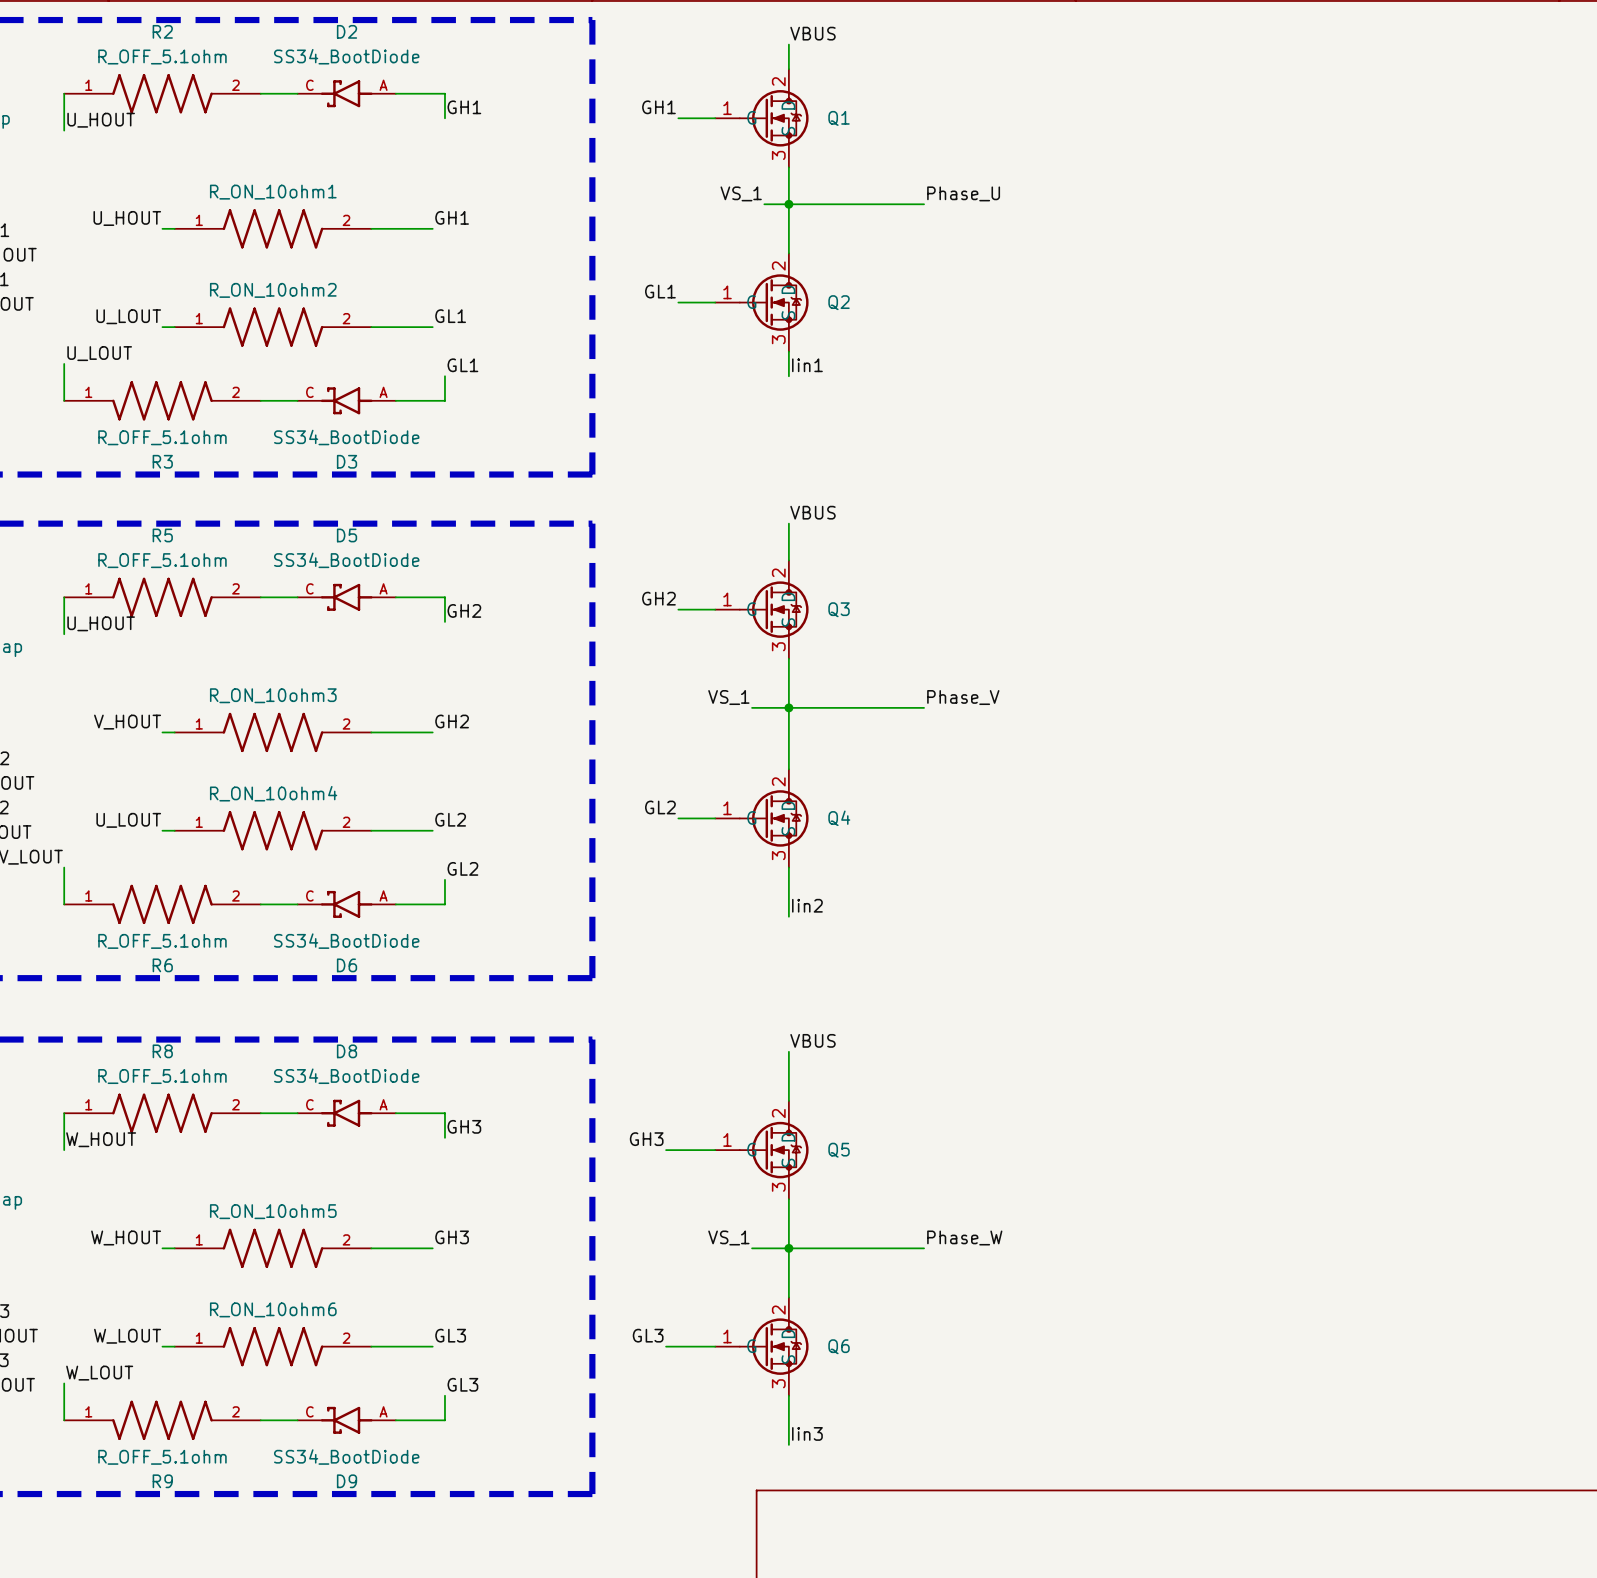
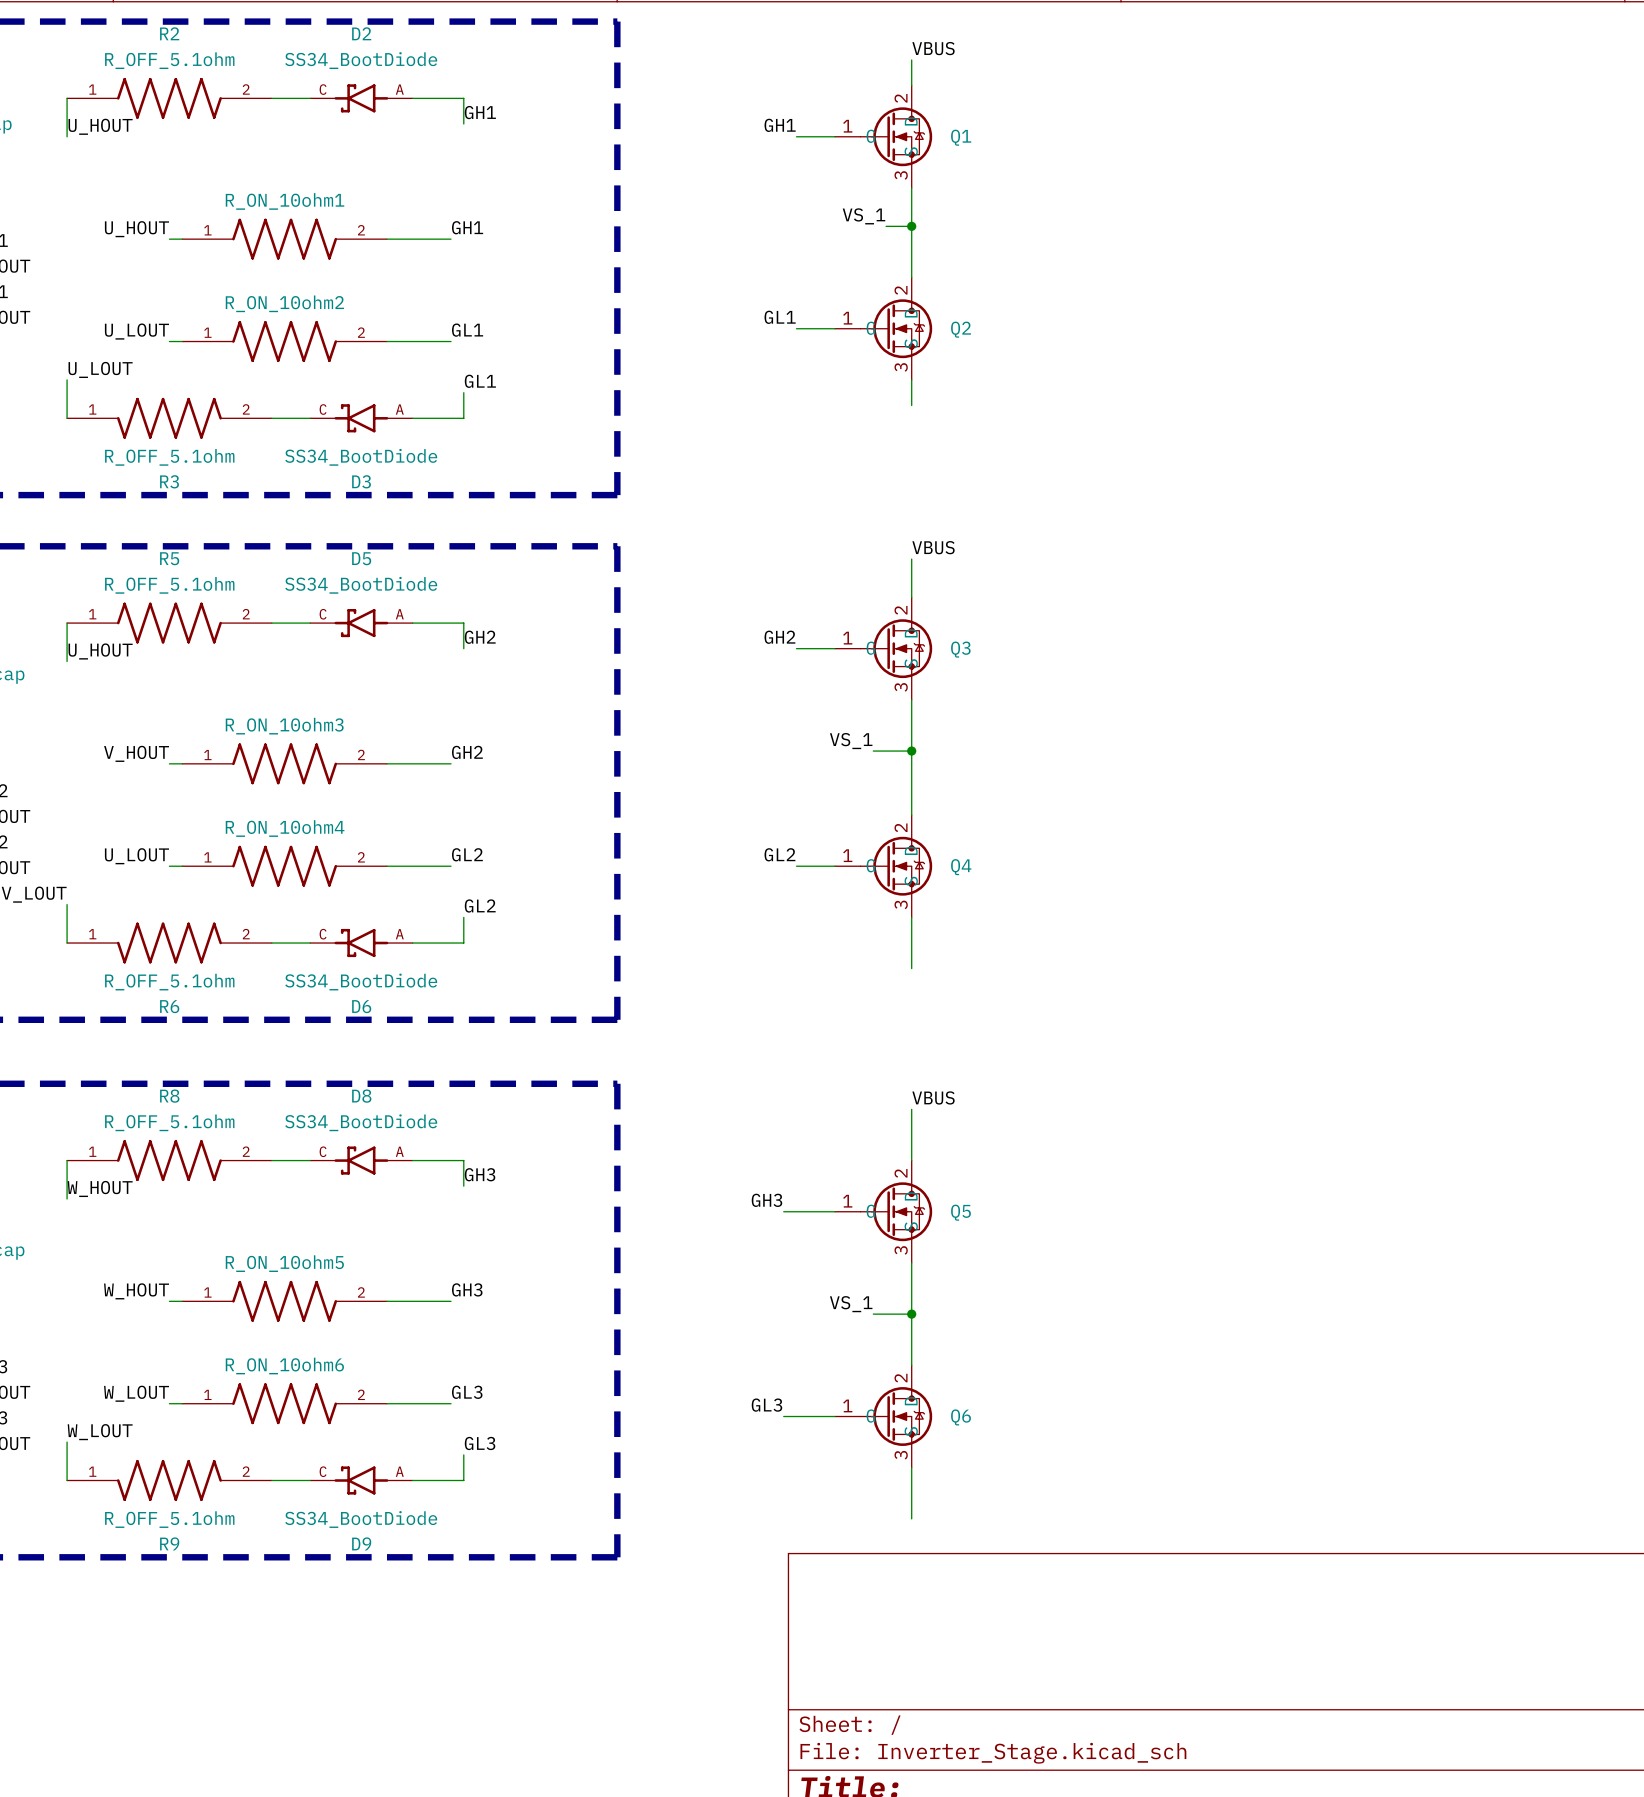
label position: VBUS (812, 33) -> VBUS (933, 48)
wire: (788, 44) (788, 69) -> (911, 59) (911, 85)
label position: GH1 (658, 107) -> GH1 (780, 125)
wire: (678, 118) (715, 118) -> (796, 136) (834, 136)
Q1 position: (761, 118) -> (883, 136)
wire: (788, 167) (788, 253) -> (911, 187) (911, 277)
label position: VS_1 (741, 193) -> VS_1 (863, 216)
label: Phase_U (963, 193) -> none
wire: (764, 204) (924, 204) -> none
junction: (788, 204) -> none
wire: none -> (886, 226) (911, 226)
junction: none -> (911, 226)
label position: GL1 (660, 291) -> GL1 (780, 317)
wire: (678, 302) (715, 302) -> (796, 328) (834, 328)
Q2 position: (761, 302) -> (883, 328)
wire: (788, 351) (788, 376) -> (911, 379) (911, 405)
label: Iin1 (807, 365) -> none
label position: VBUS (812, 512) -> VBUS (933, 547)
wire: (788, 523) (788, 560) -> (911, 559) (911, 597)
label position: GH2 (658, 598) -> GH2 (779, 637)
wire: (678, 609) (715, 609) -> (796, 648) (834, 648)
Q3 position: (761, 609) -> (883, 648)
wire: (788, 658) (788, 769) -> (911, 699) (911, 815)
label position: VS_1 (728, 697) -> VS_1 (851, 741)
label: Phase_V (963, 697) -> none
wire: (752, 707) (924, 707) -> none
junction: (788, 707) -> none
wire: none -> (873, 751) (911, 751)
junction: none -> (911, 751)
label position: GL2 (660, 807) -> GL2 (779, 854)
wire: (678, 818) (715, 818) -> (796, 866) (834, 866)
Q4 position: (761, 818) -> (883, 866)
wire: (788, 867) (788, 916) -> (911, 917) (911, 968)
label: Iin2 (807, 905) -> none
label position: VBUS (812, 1040) -> VBUS (933, 1097)
wire: (788, 1051) (788, 1100) -> (911, 1109) (911, 1160)
label position: GH3 (646, 1139) -> GH3 (766, 1200)
wire: (666, 1150) (715, 1150) -> (783, 1211) (834, 1211)
Q5 position: (761, 1150) -> (883, 1211)
wire: (788, 1199) (788, 1297) -> (911, 1262) (911, 1365)
label position: VS_1 (728, 1237) -> VS_1 (851, 1304)
label: Phase_W (964, 1237) -> none
wire: (752, 1248) (924, 1248) -> none
junction: (788, 1248) -> none
wire: none -> (873, 1314) (911, 1314)
junction: none -> (911, 1314)
label position: GL3 (648, 1335) -> GL3 (766, 1405)
wire: (666, 1346) (715, 1346) -> (783, 1416) (834, 1416)
Q6 position: (761, 1346) -> (883, 1416)
wire: (788, 1395) (788, 1444) -> (911, 1467) (911, 1518)
label: Iin3 (807, 1433) -> none

